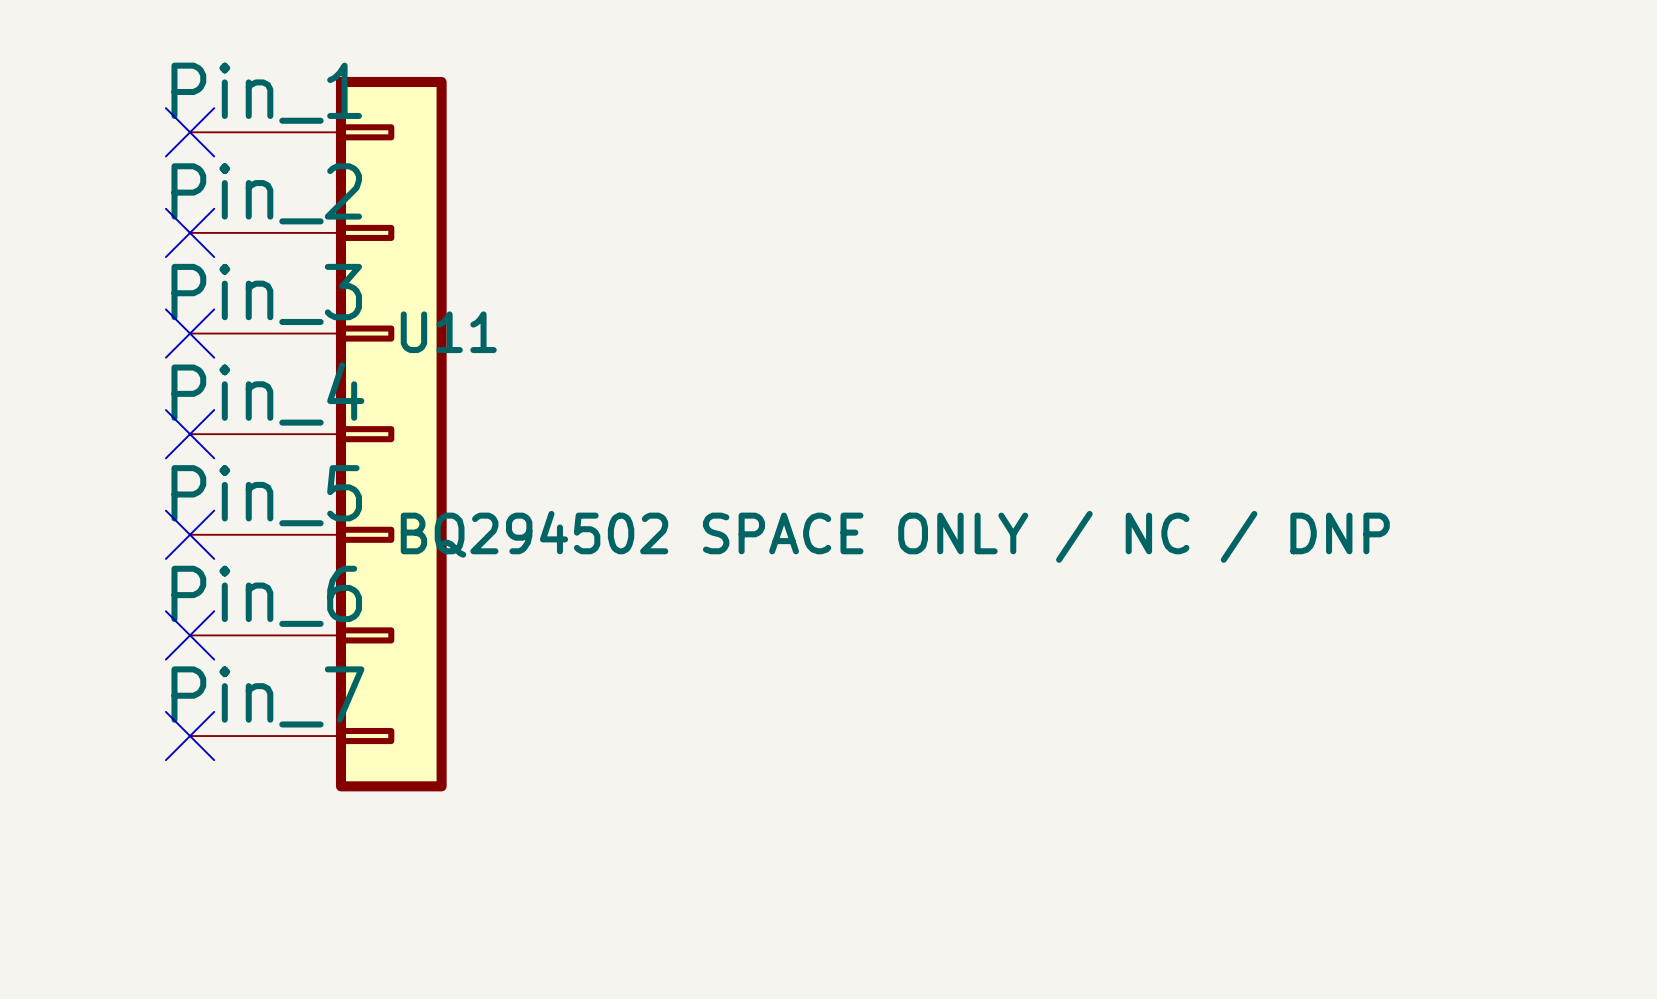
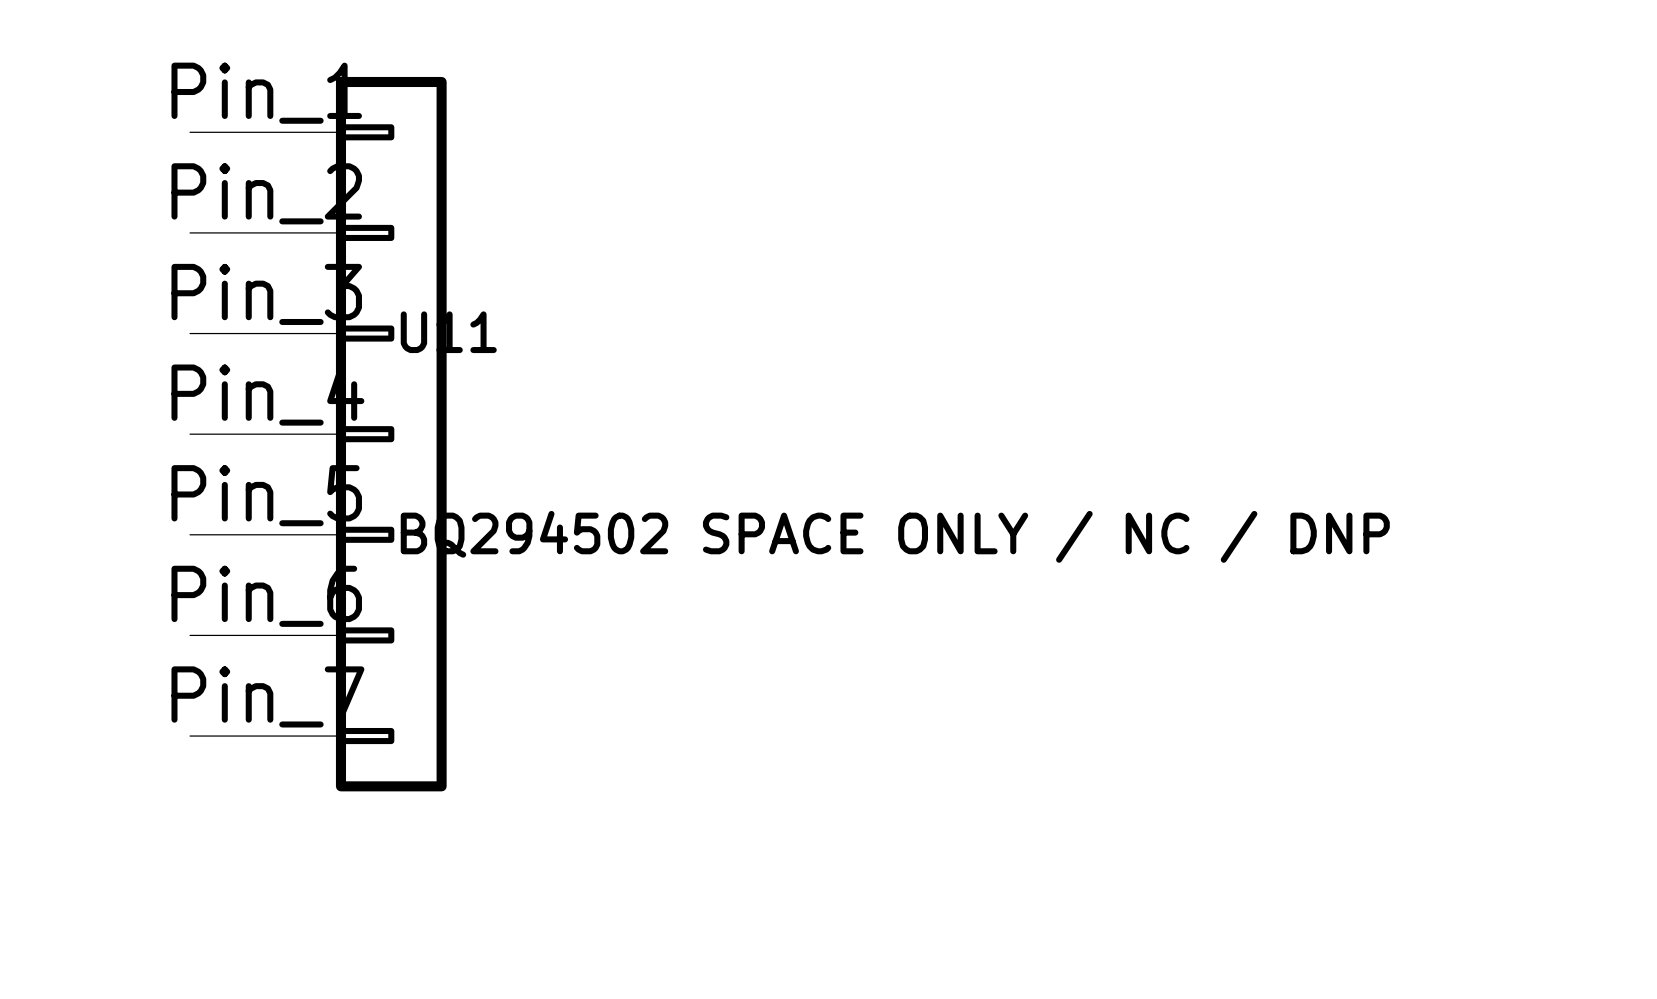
no-connect mark: (190, 132) -> none
no-connect mark: (190, 232) -> none
no-connect mark: (190, 333) -> none
no-connect mark: (190, 434) -> none
no-connect mark: (190, 534) -> none
no-connect mark: (190, 635) -> none
no-connect mark: (190, 736) -> none

